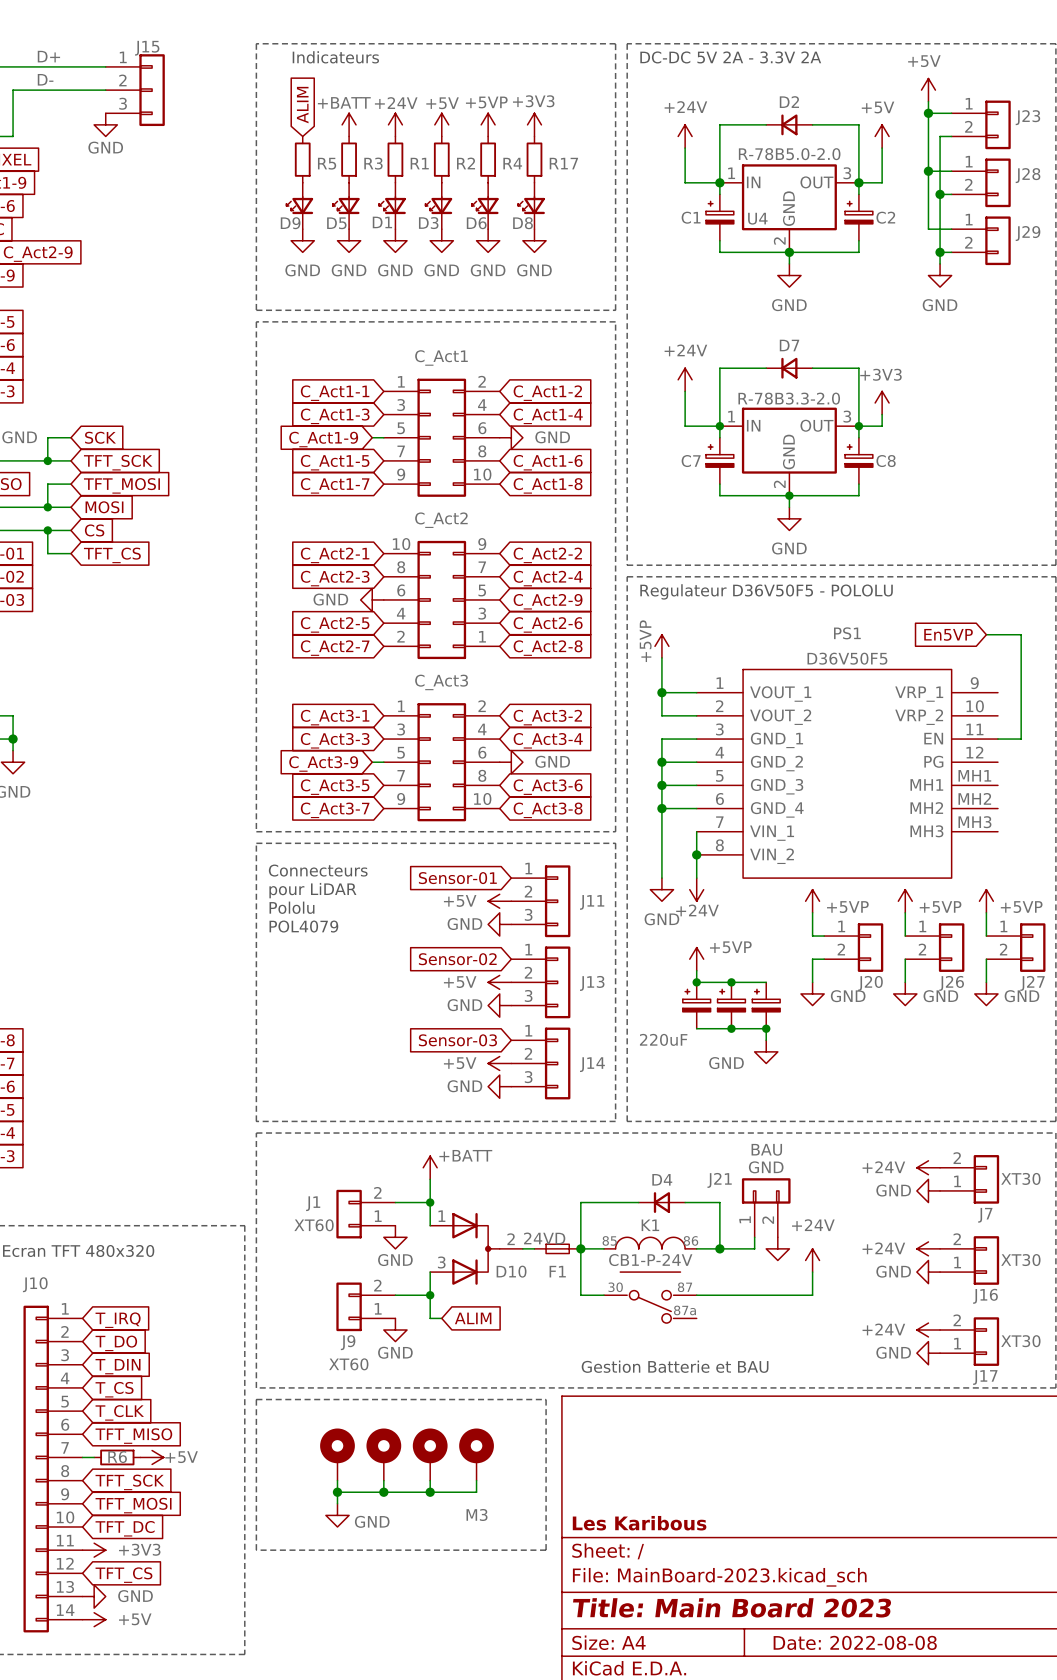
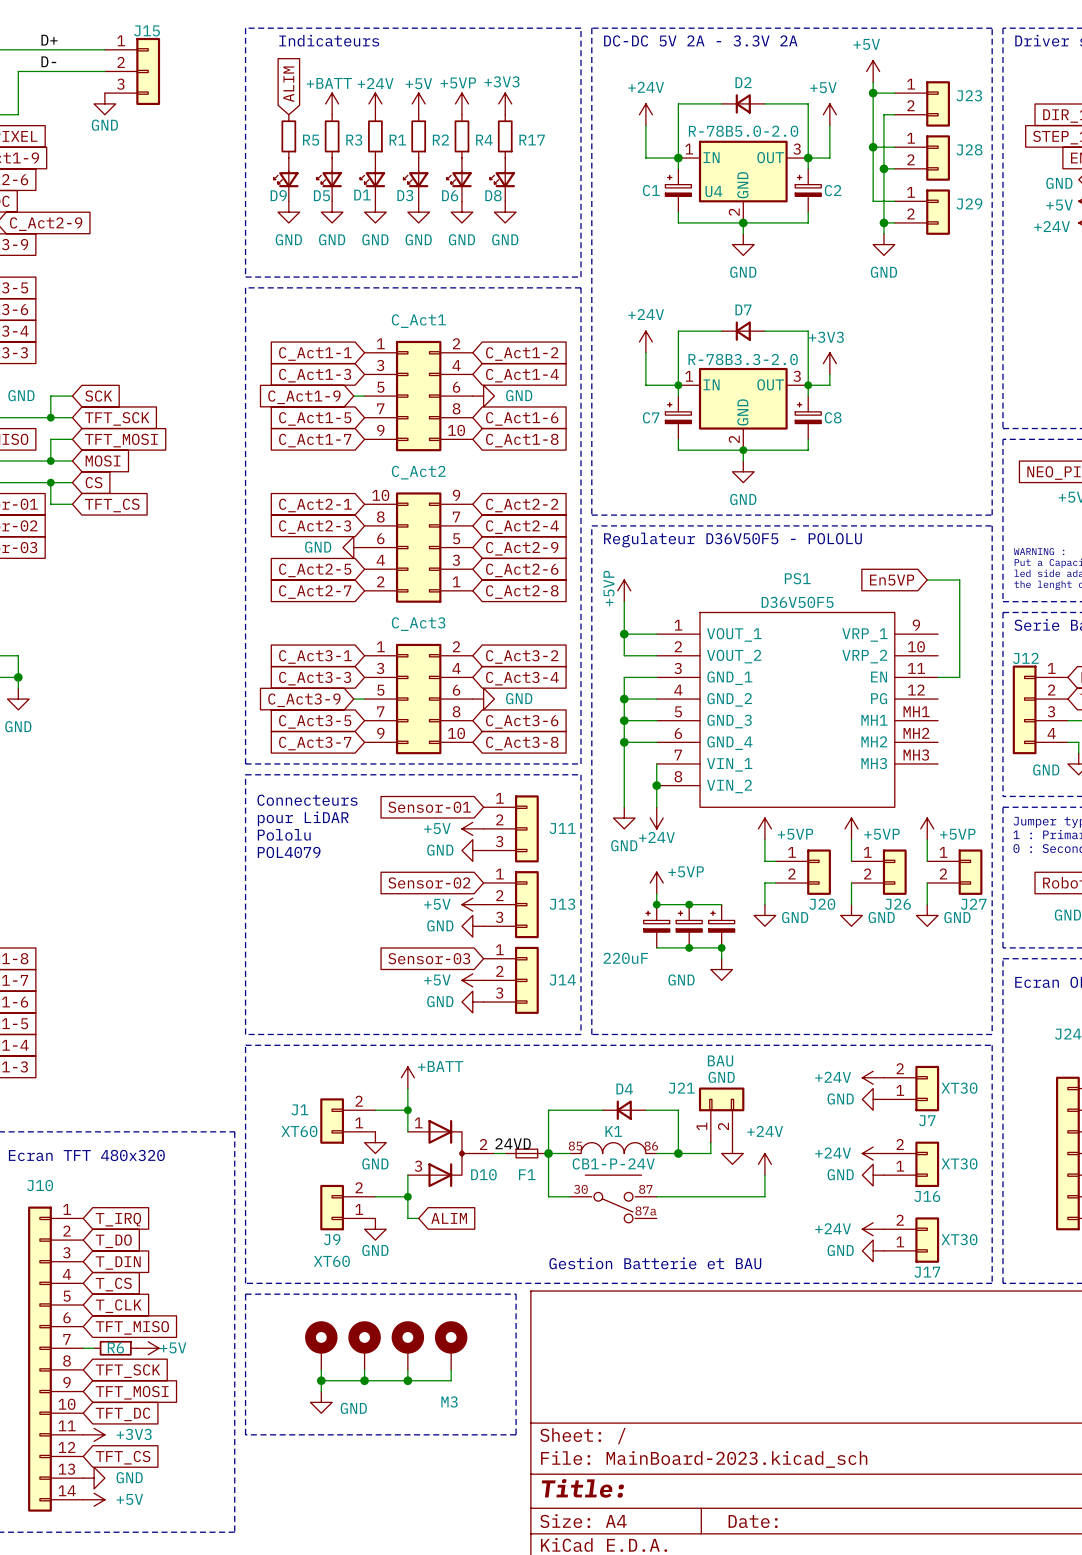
title block: Les Karibous (639, 1523) -> none
title block: Title: Main Board 2023 (732, 1607) -> Title: (582, 1488)
title block: Date: 2022-08-08 (855, 1642) -> Date: (753, 1521)

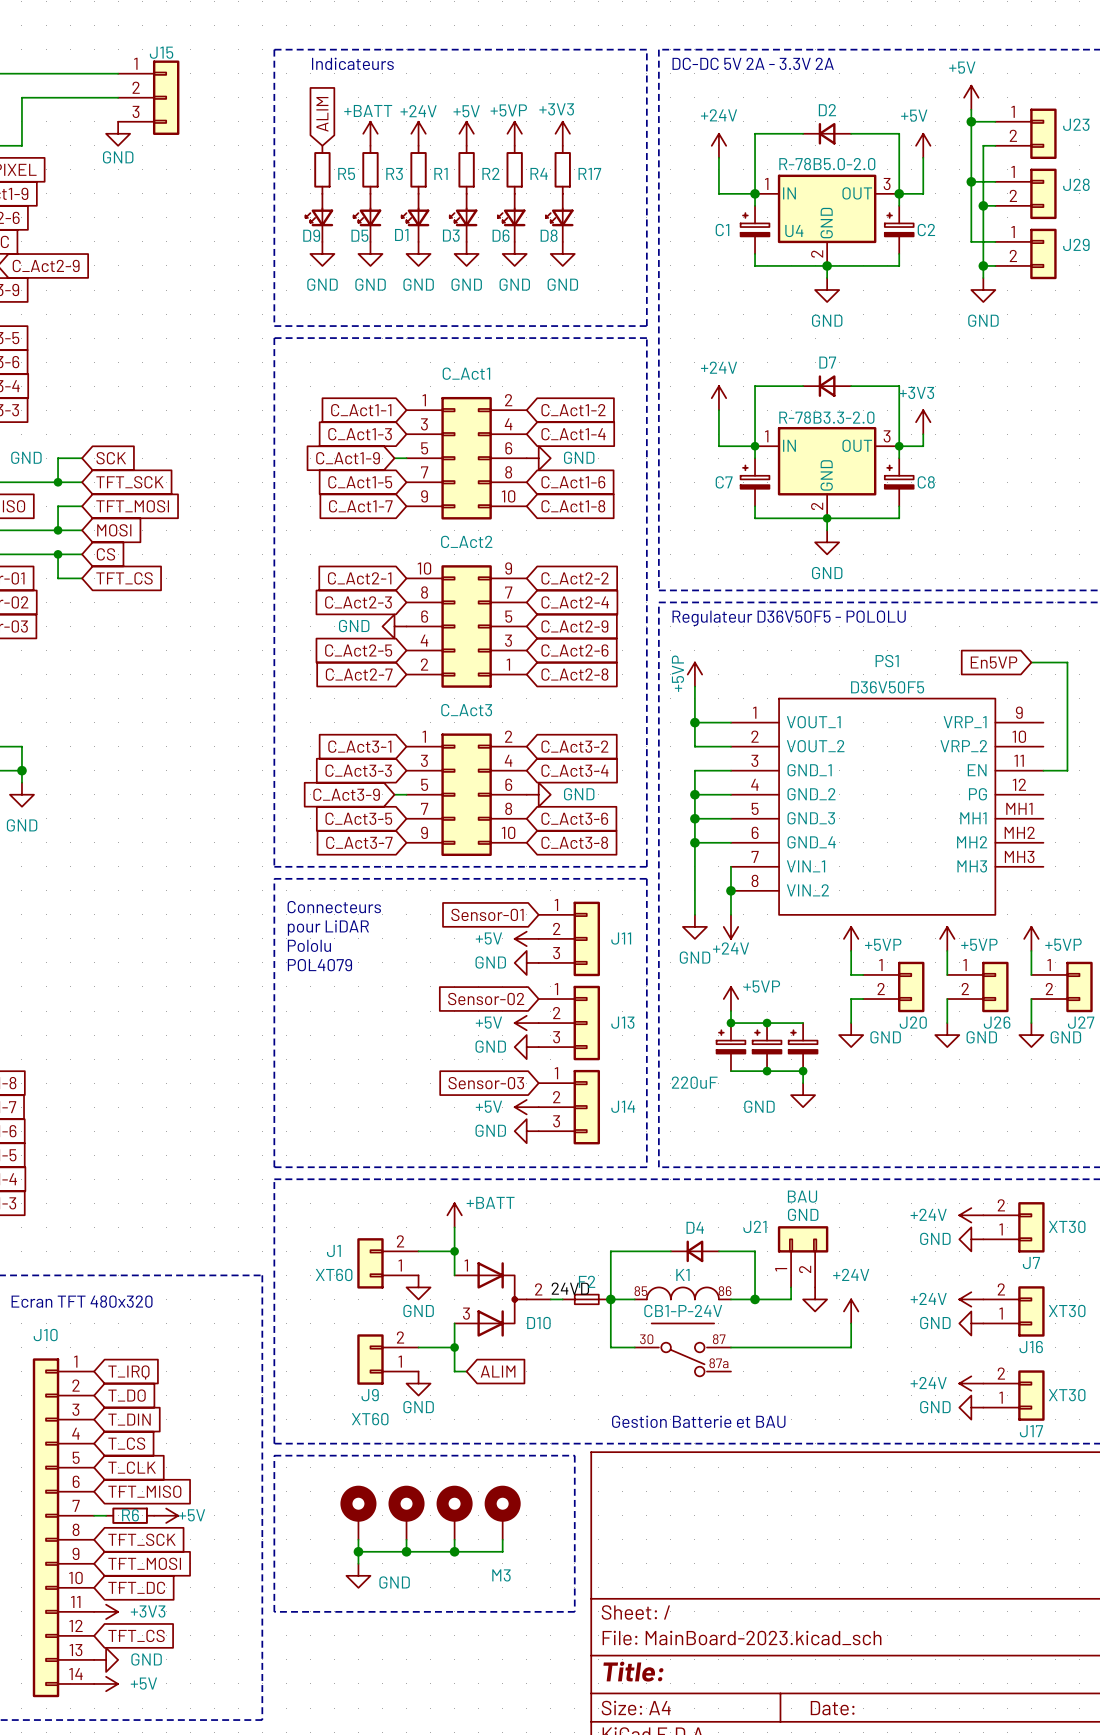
label: D+ (49, 40) -> none
label: D- (48, 61) -> none
F1 name: F1 (527, 1174) -> F2 (587, 1281)

